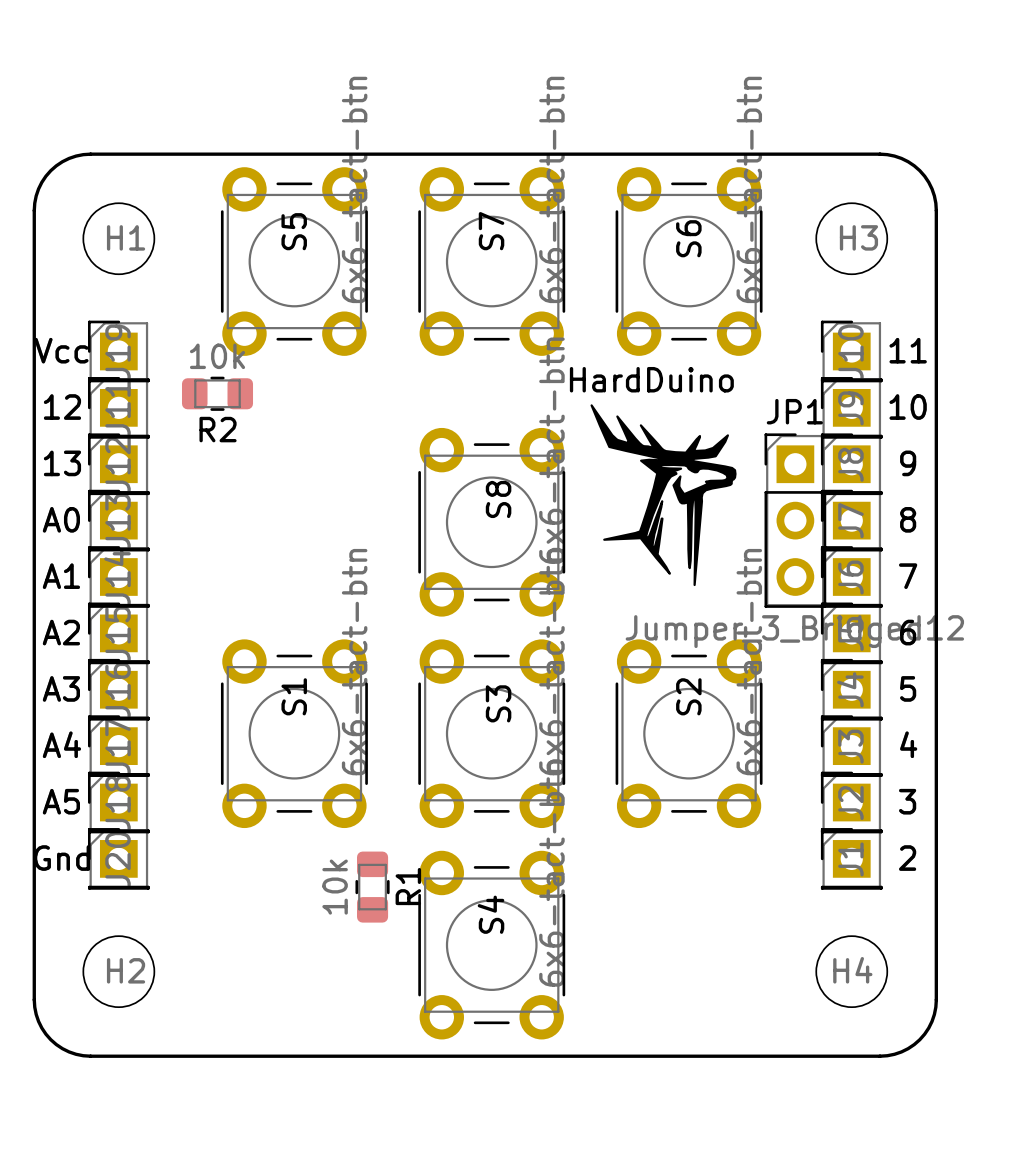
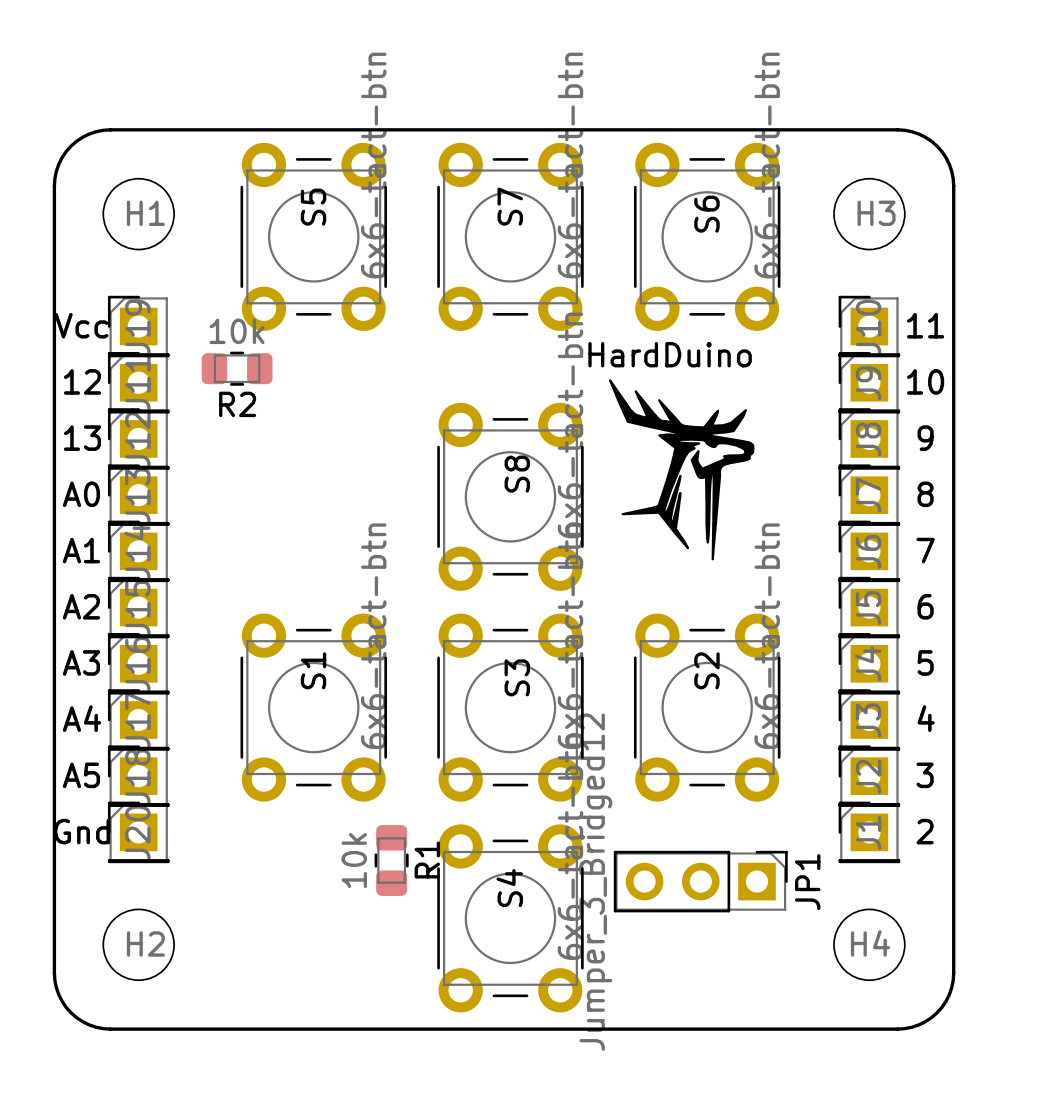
JP1 rotation: 0° (795, 520) -> 90° clockwise (700, 881)
JP1 position: (795, 520) -> (700, 881)

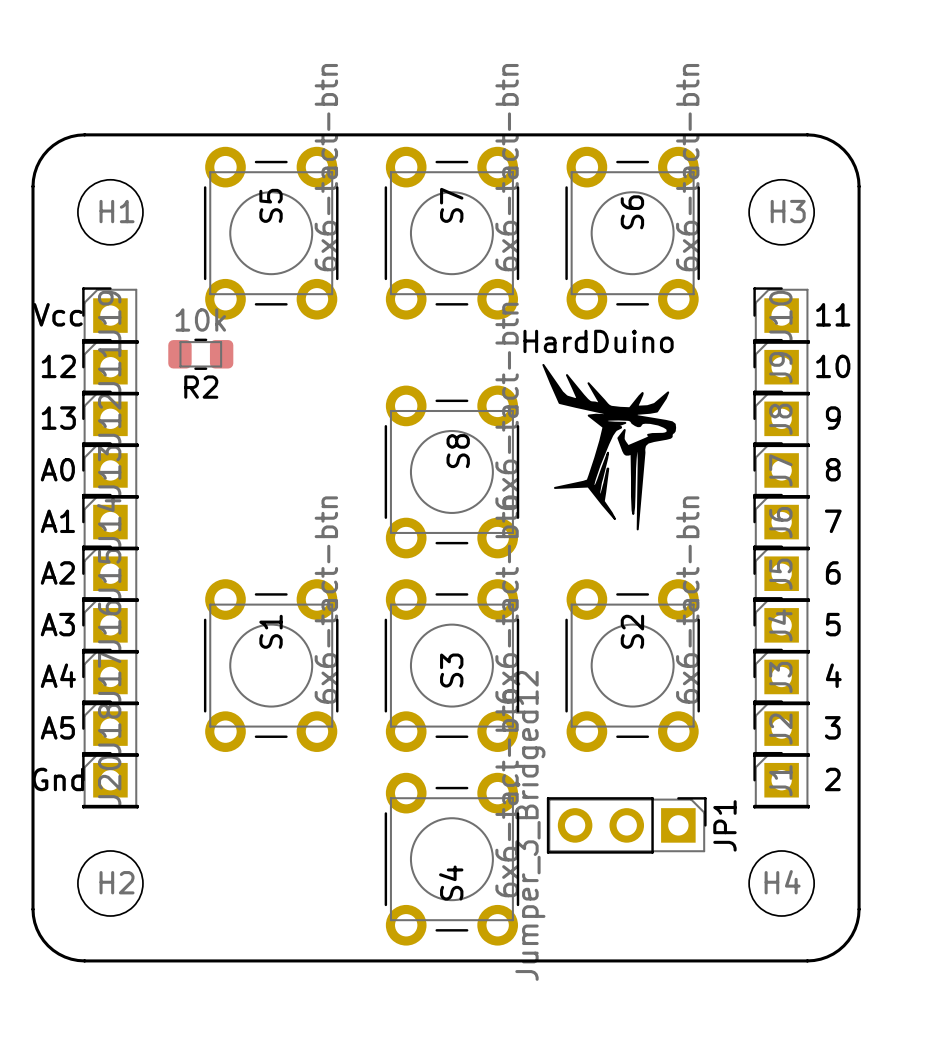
S3 name position: S3 (517, 677) -> S3 (451, 670)
R1: 10k (391, 860) -> none
S4 name position: S4 (509, 888) -> S4 (451, 883)

